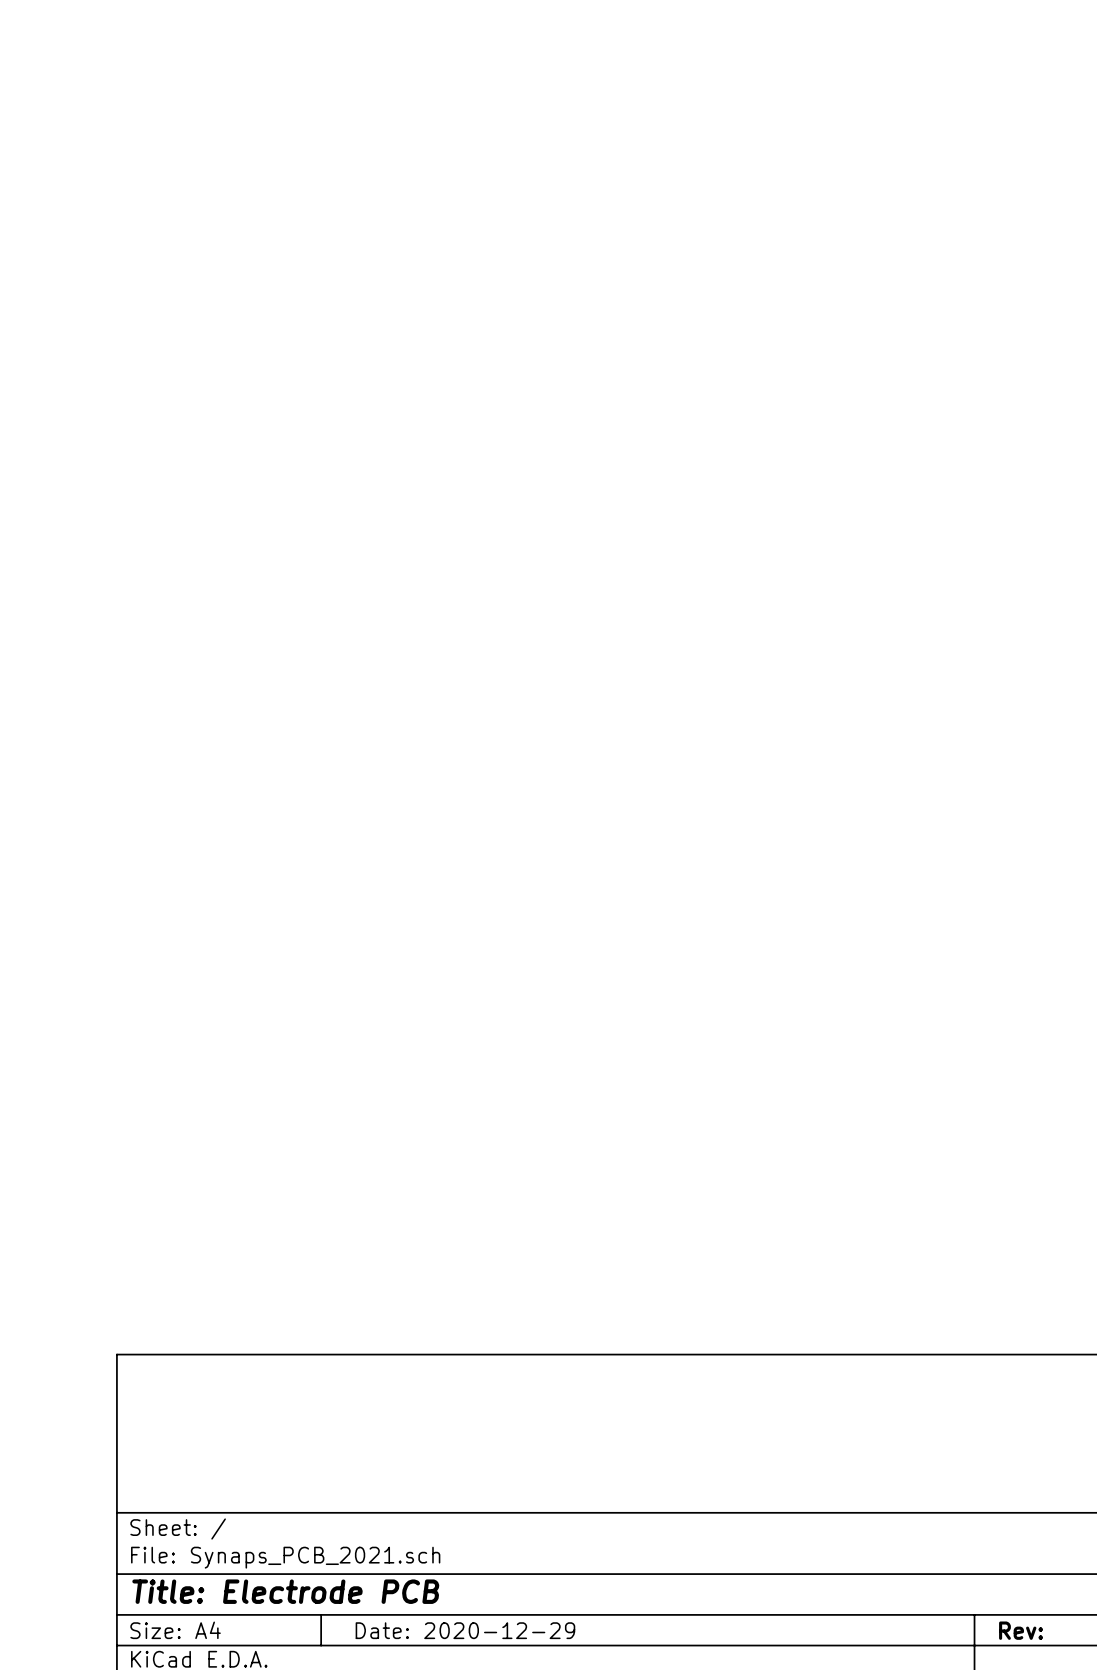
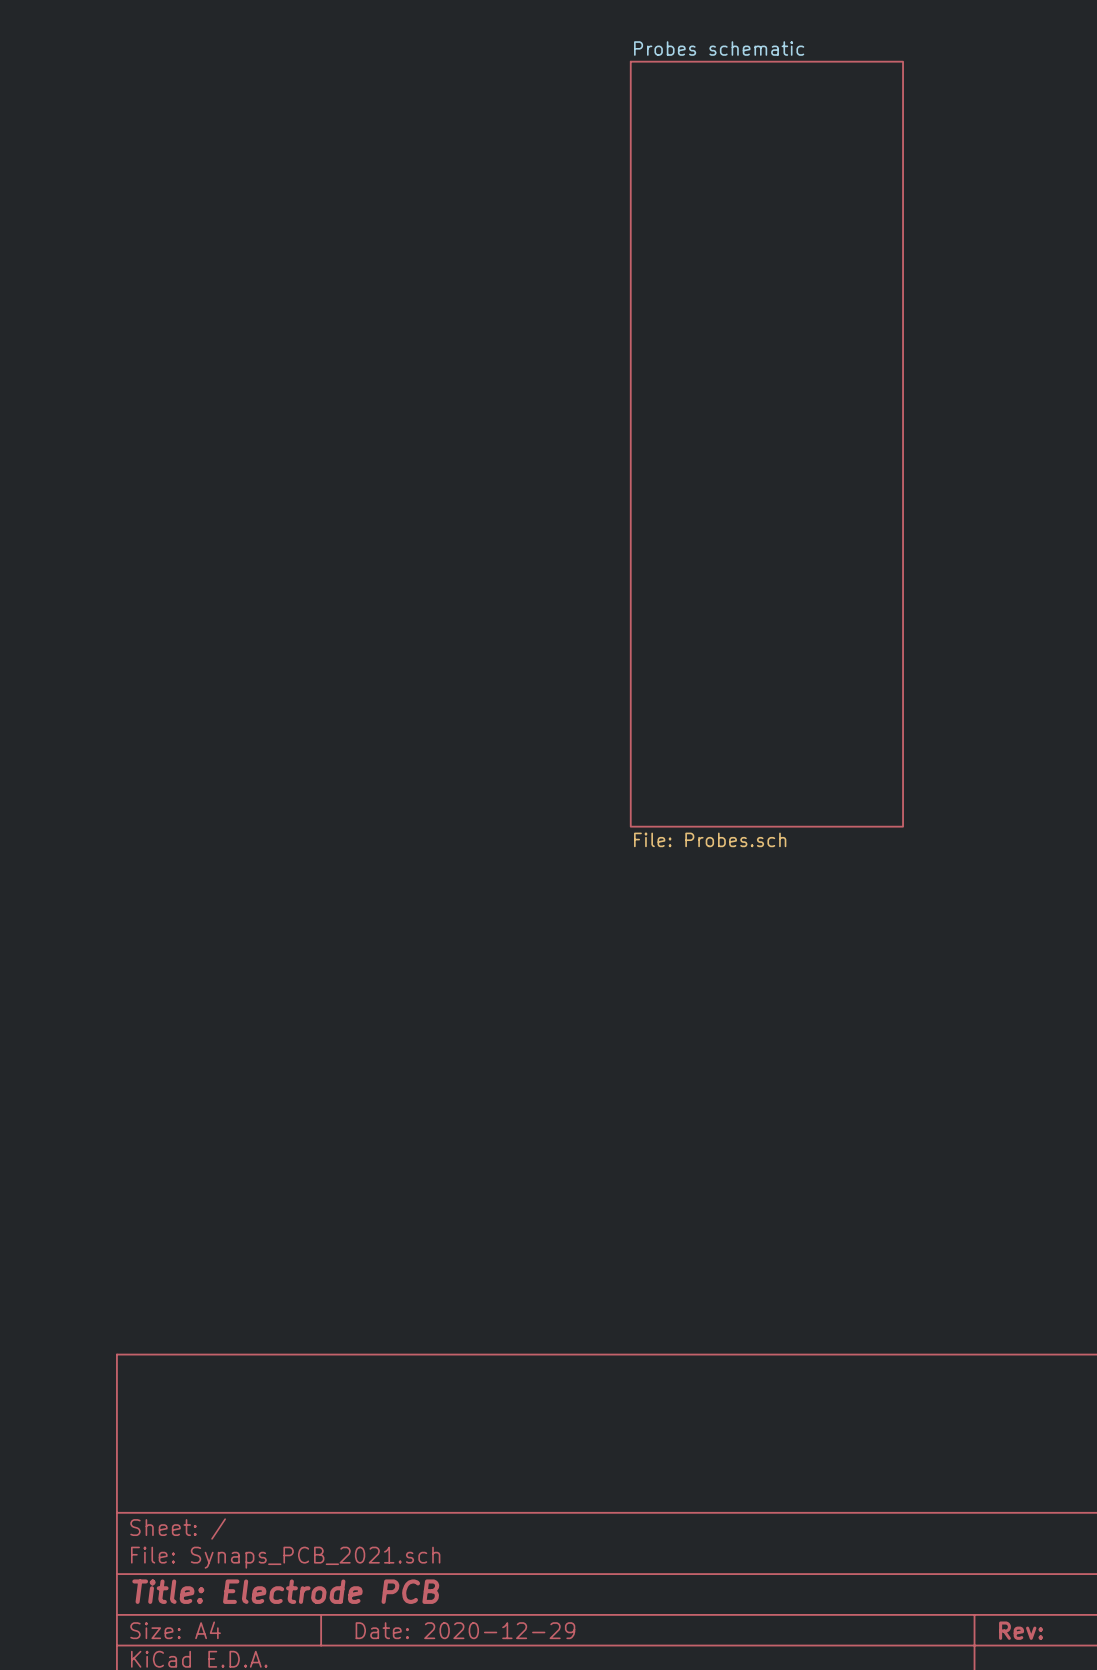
sheet Probes schematic: none -> File: Probes.sch (766, 444)

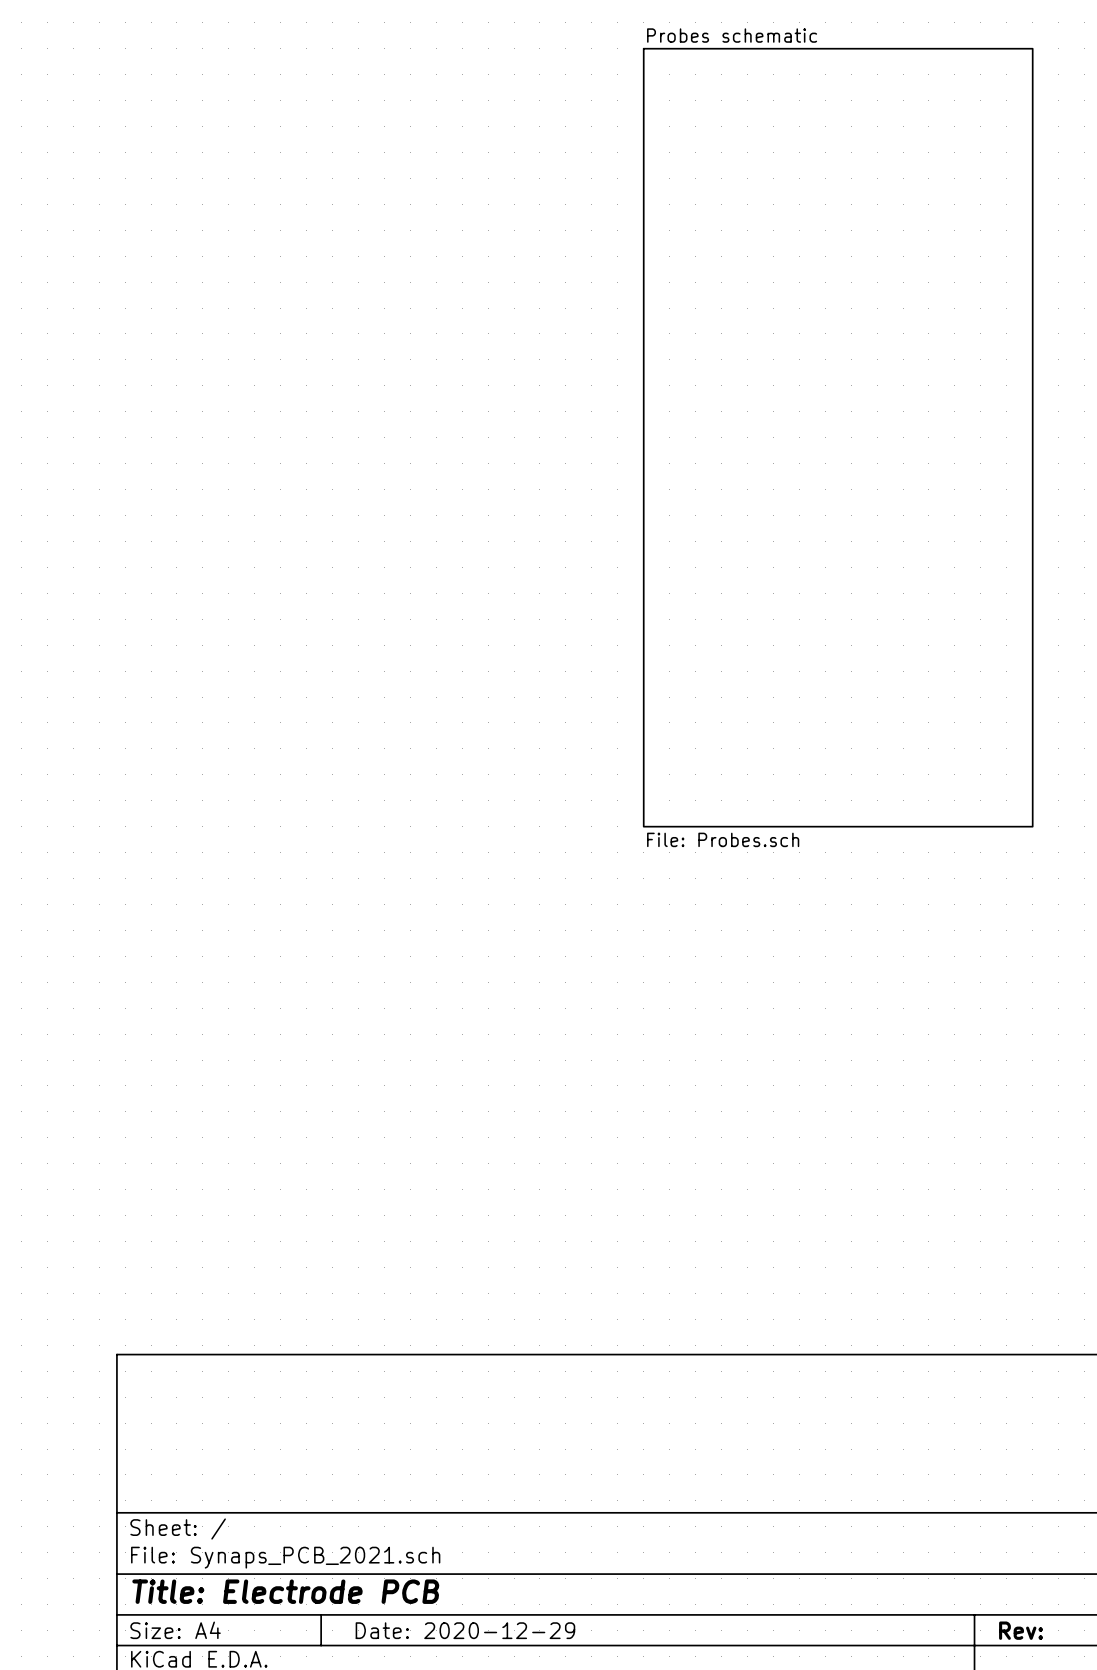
sheet Probes schematic: none -> File: Probes.sch (838, 437)
sheet Probes schematic: File: Probes.sch (766, 444) -> none

